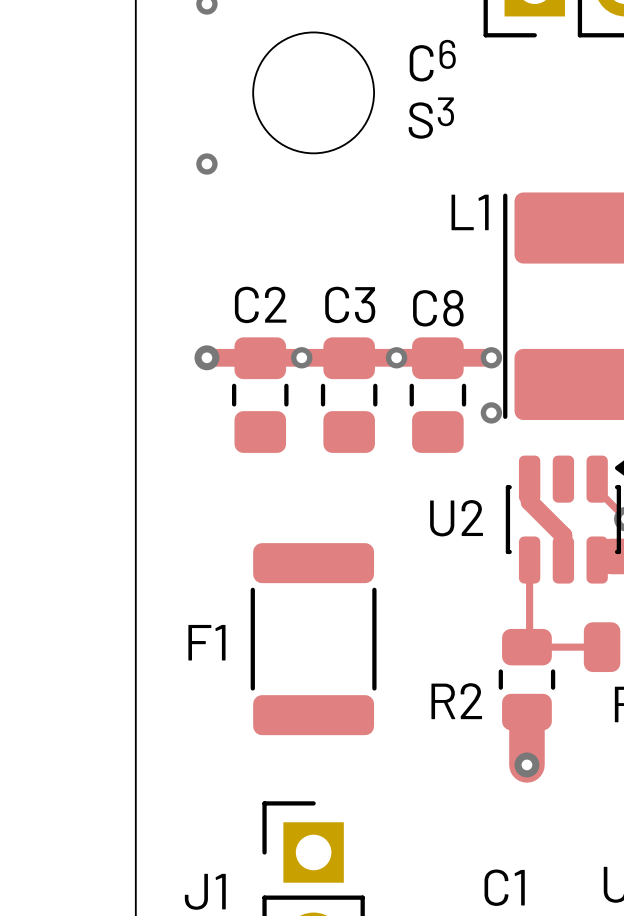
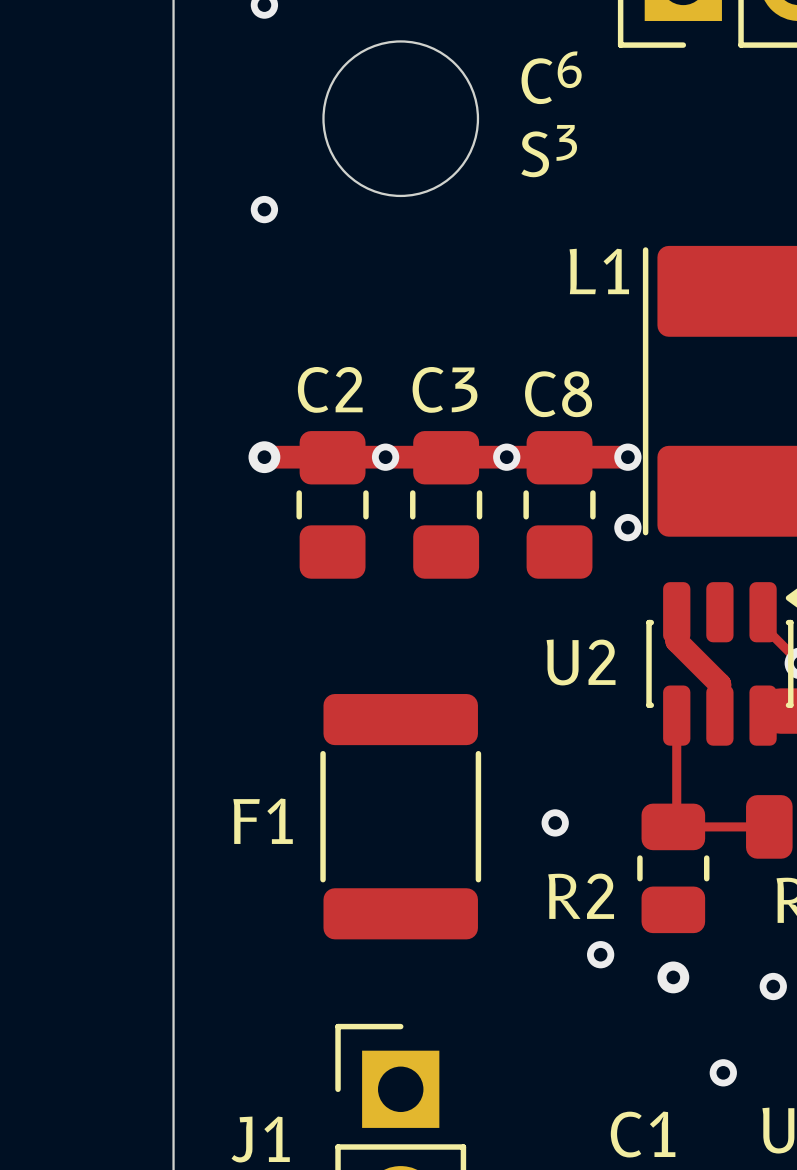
via: none -> (555, 822)
track: (526, 712) (526, 764) -> none
via: none -> (600, 954)
via: none -> (773, 986)
via: none -> (723, 1072)

